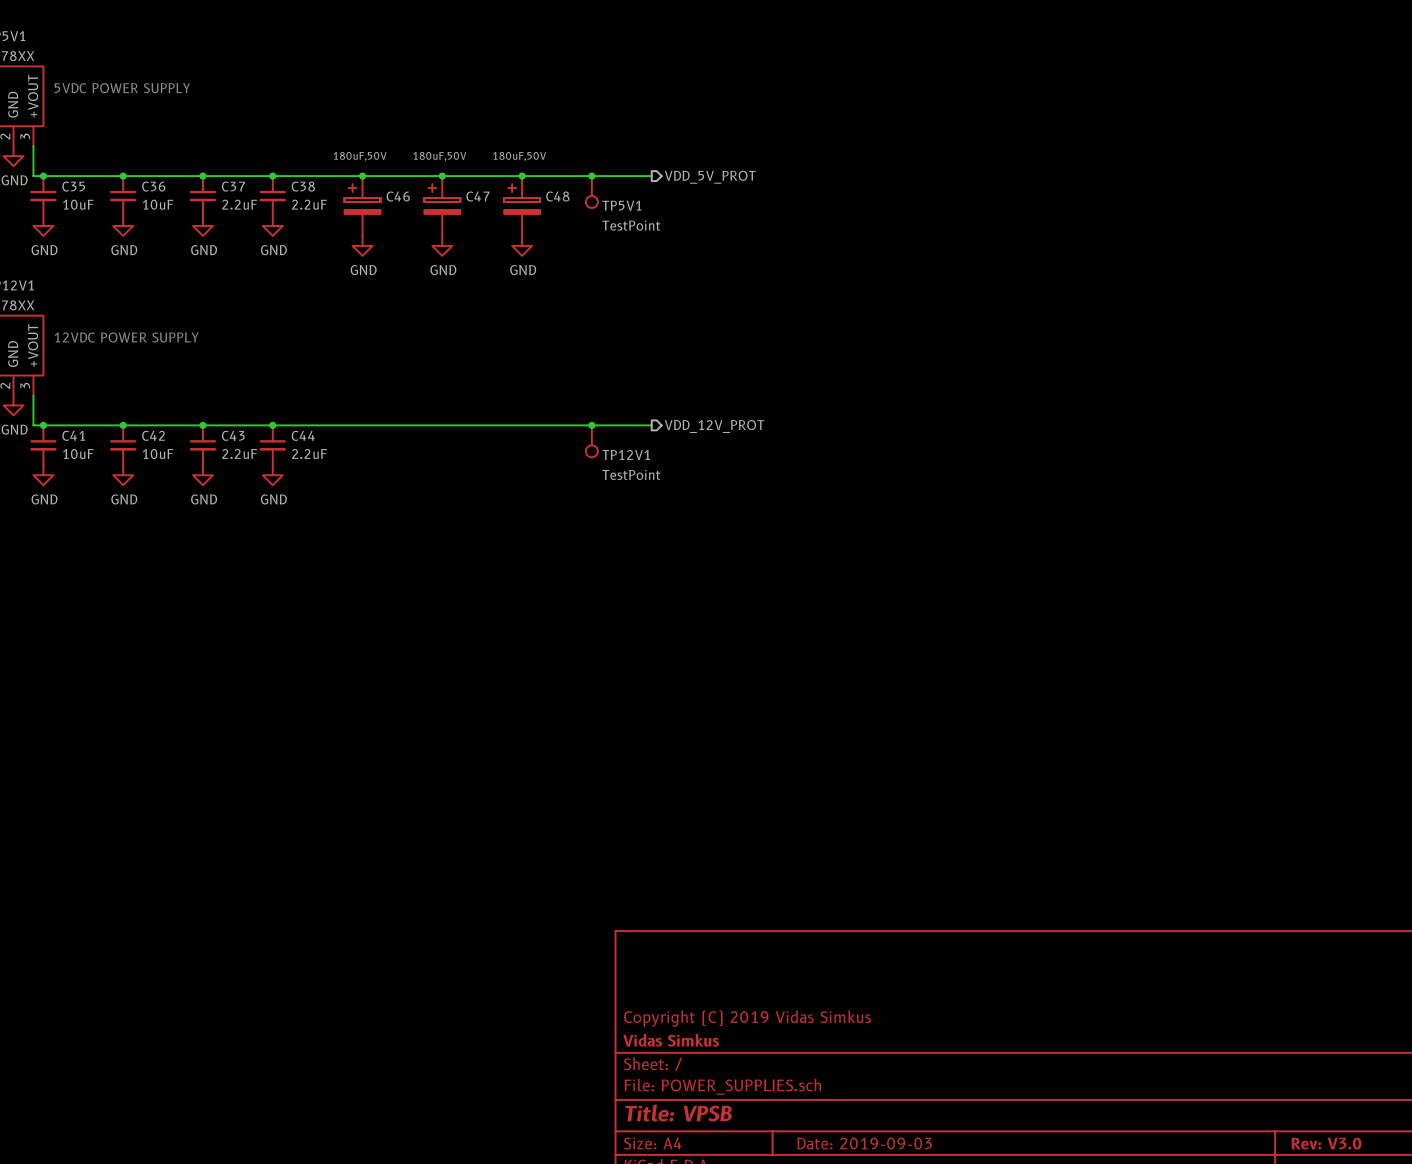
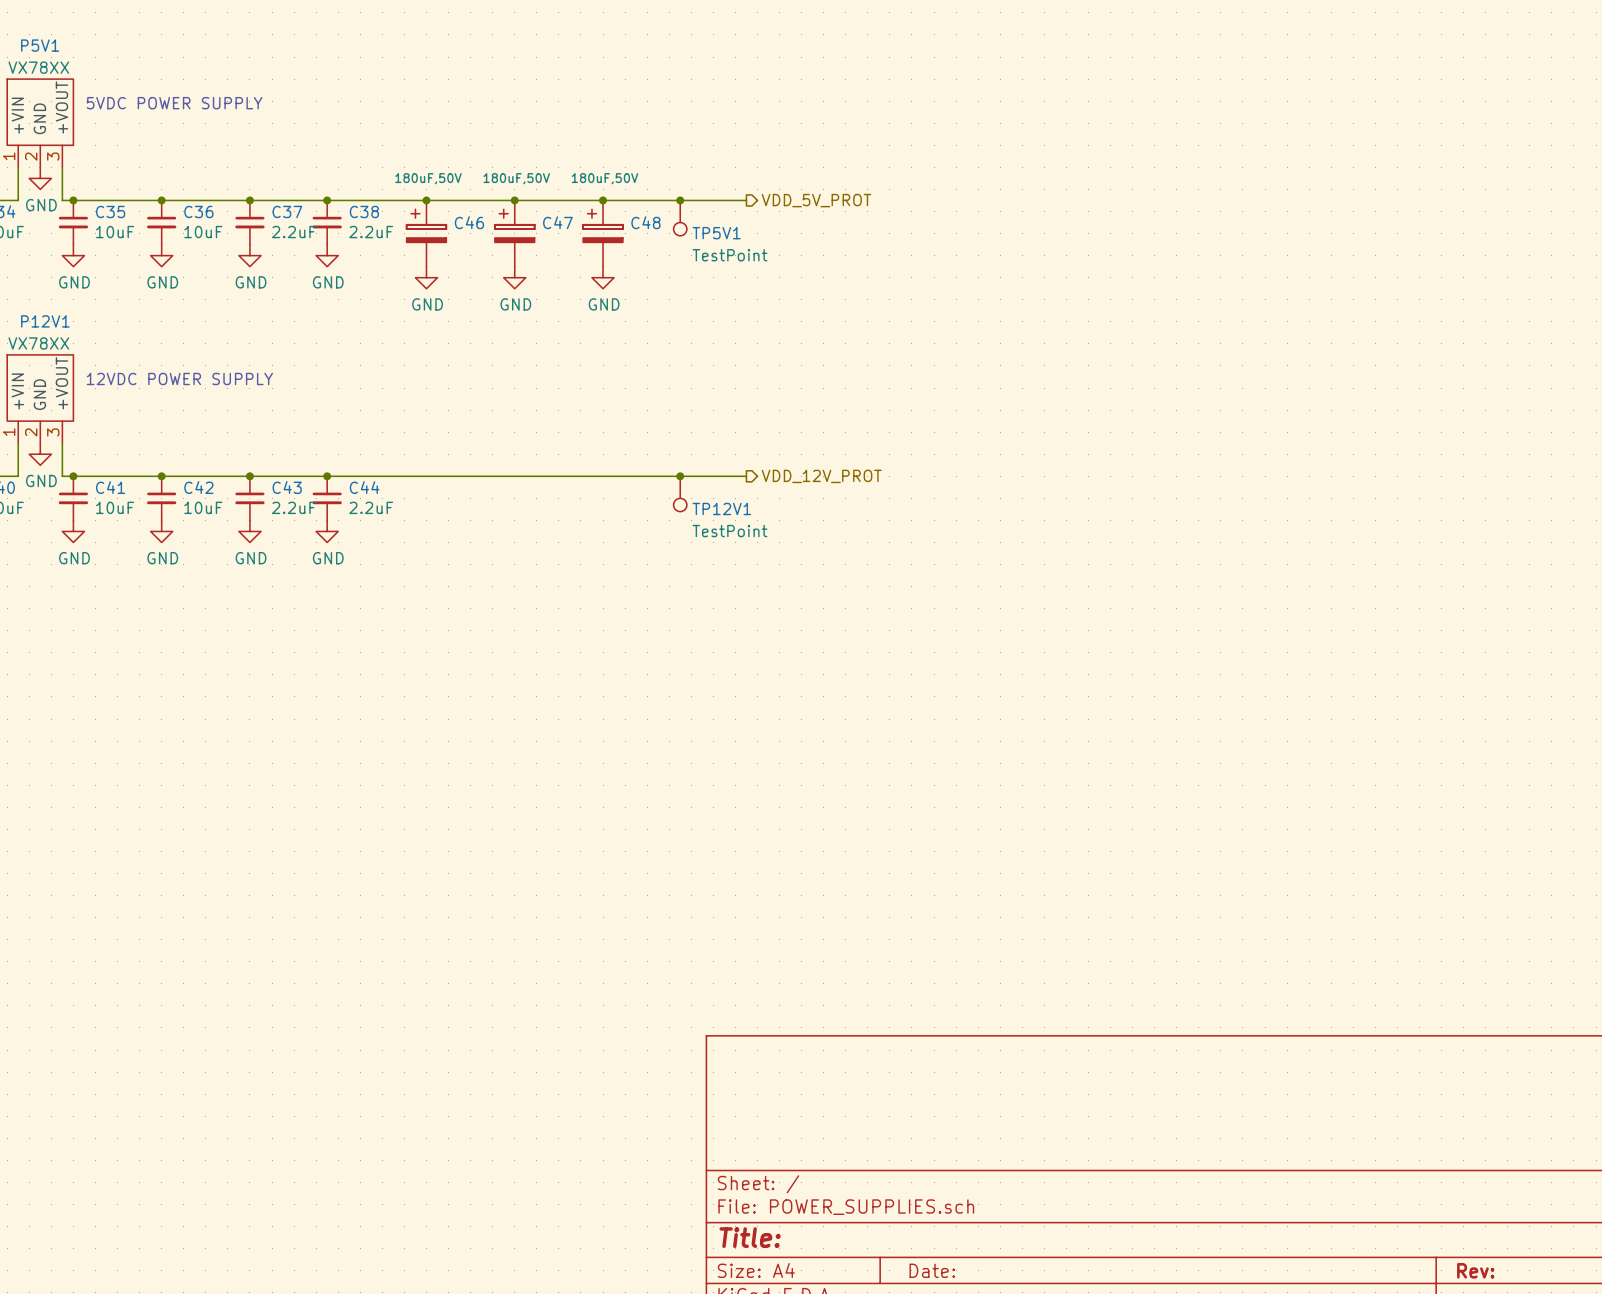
title block: Copyright (C) 2019 Vidas Simkus (747, 1018) -> none
title block: Vidas Simkus (671, 1040) -> none
title block: Title: VPSB (678, 1113) -> Title: (750, 1237)
title block: Date: 2019-09-03 (864, 1143) -> Date: (932, 1270)
title block: Rev: V3.0 (1326, 1143) -> Rev: (1475, 1270)

